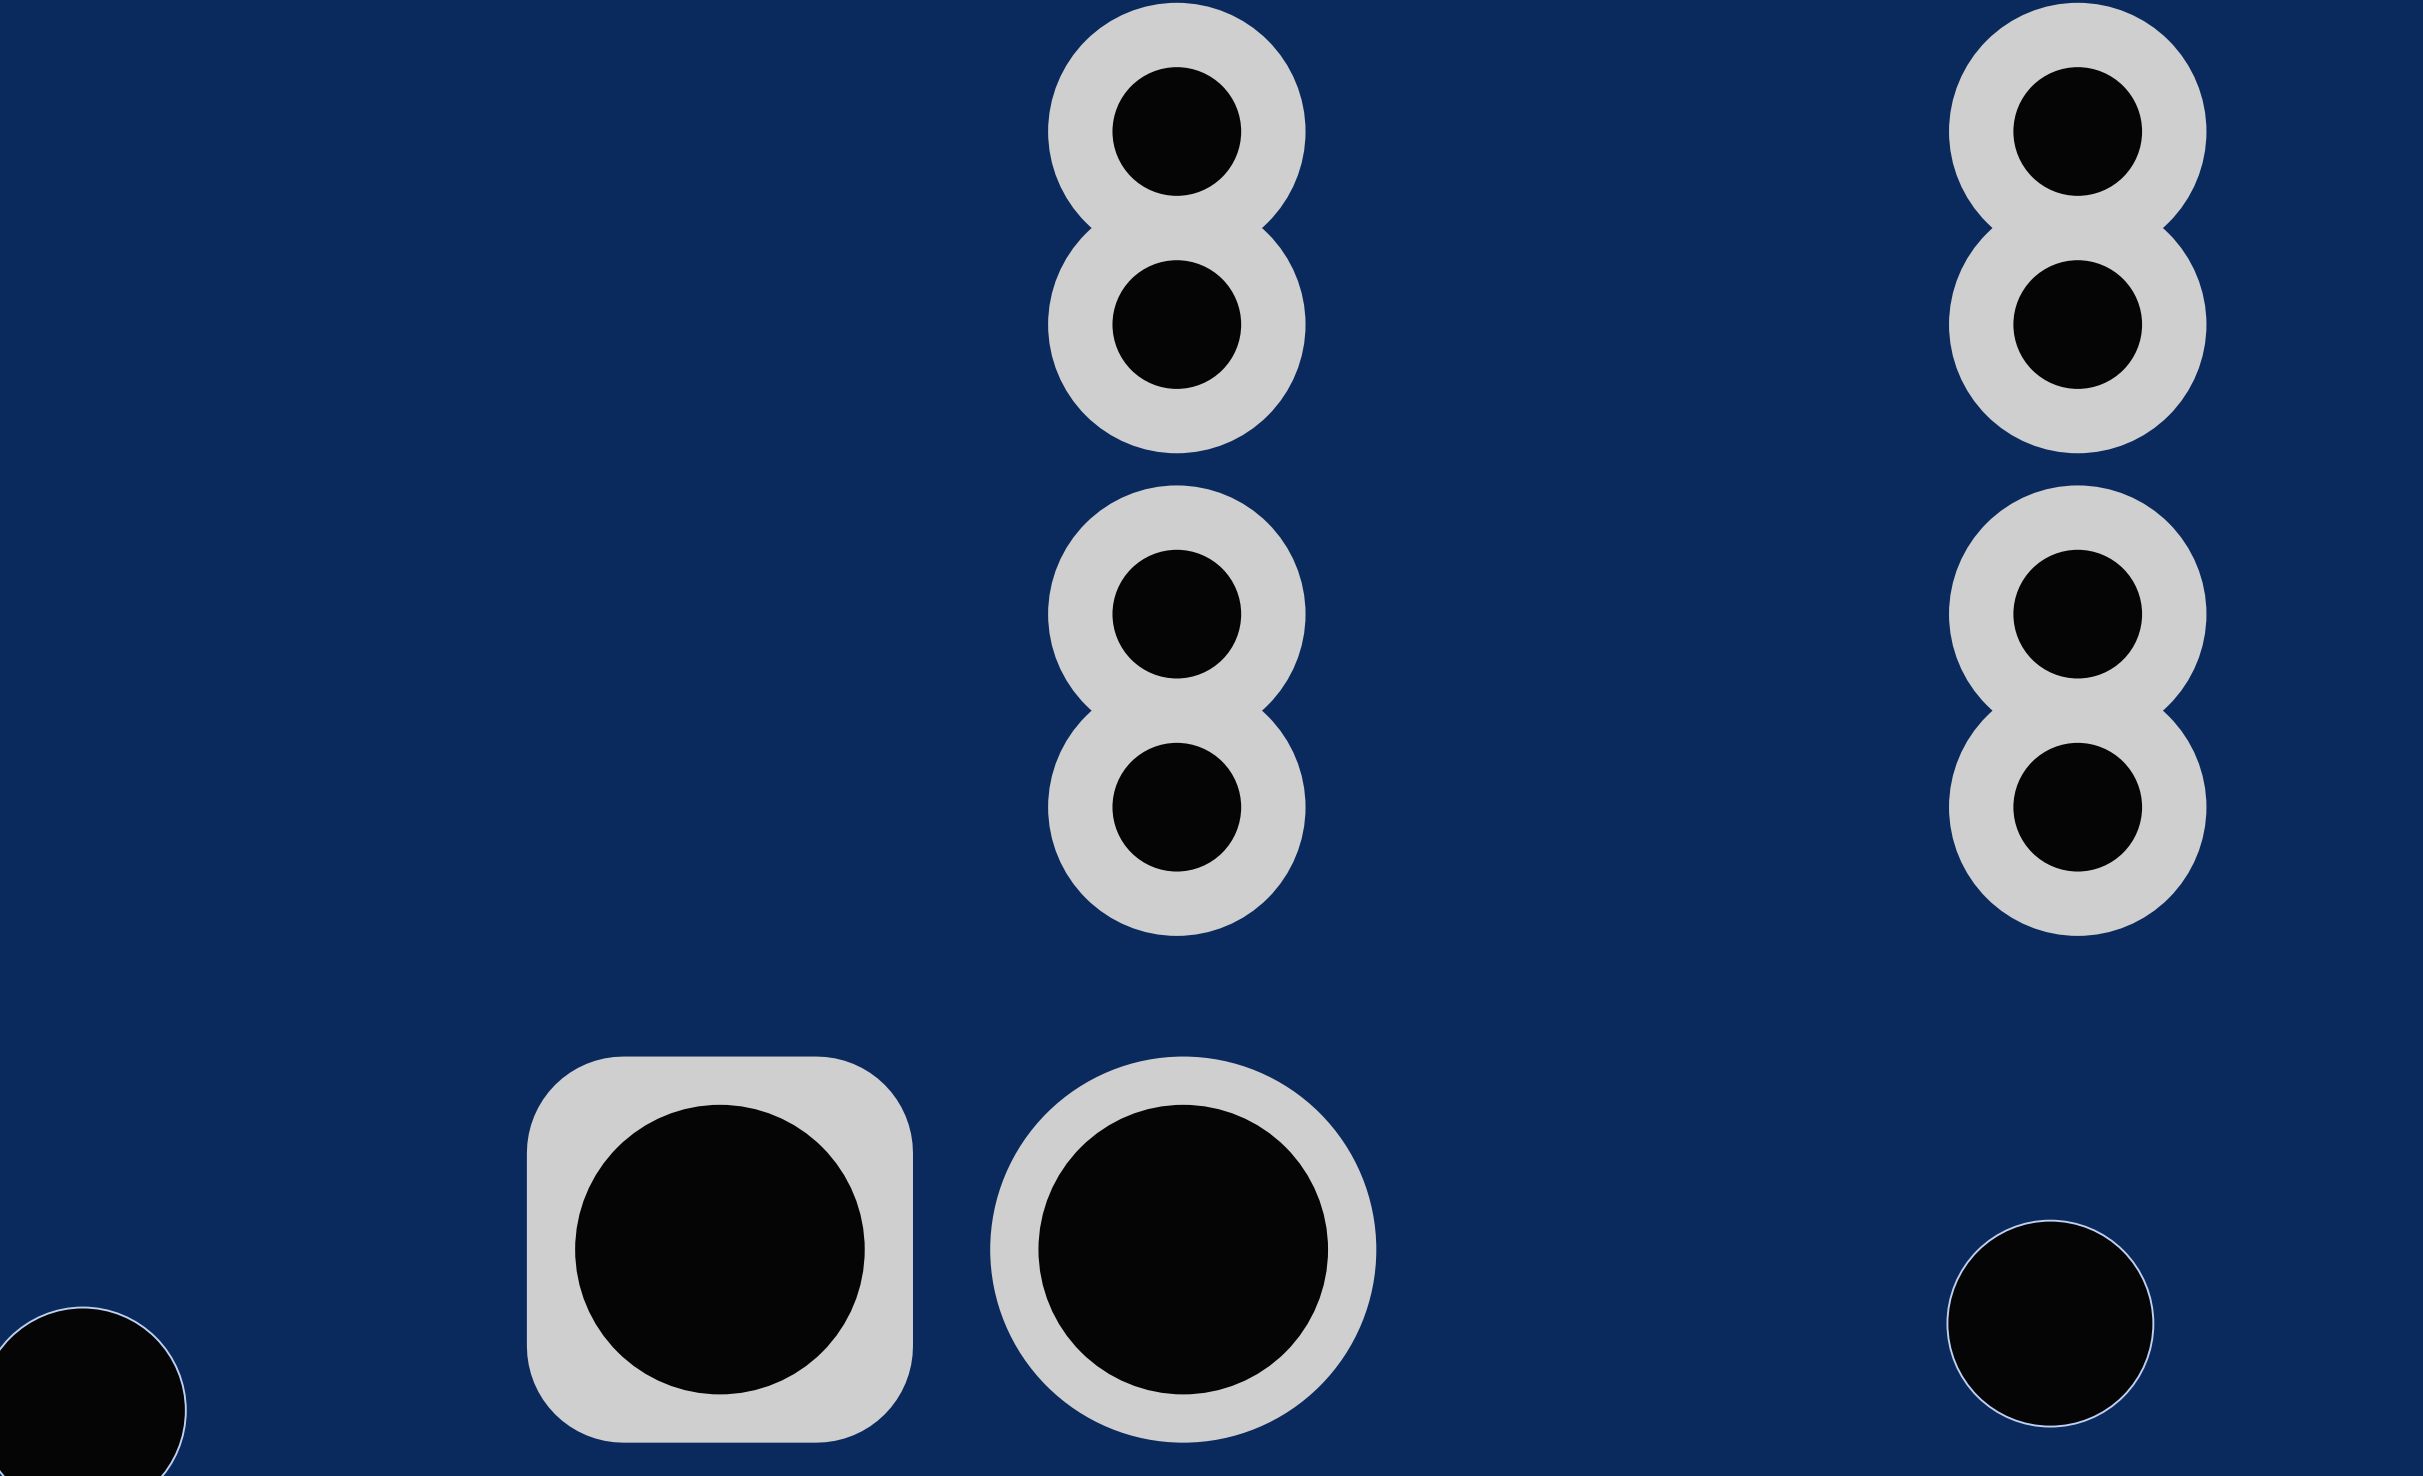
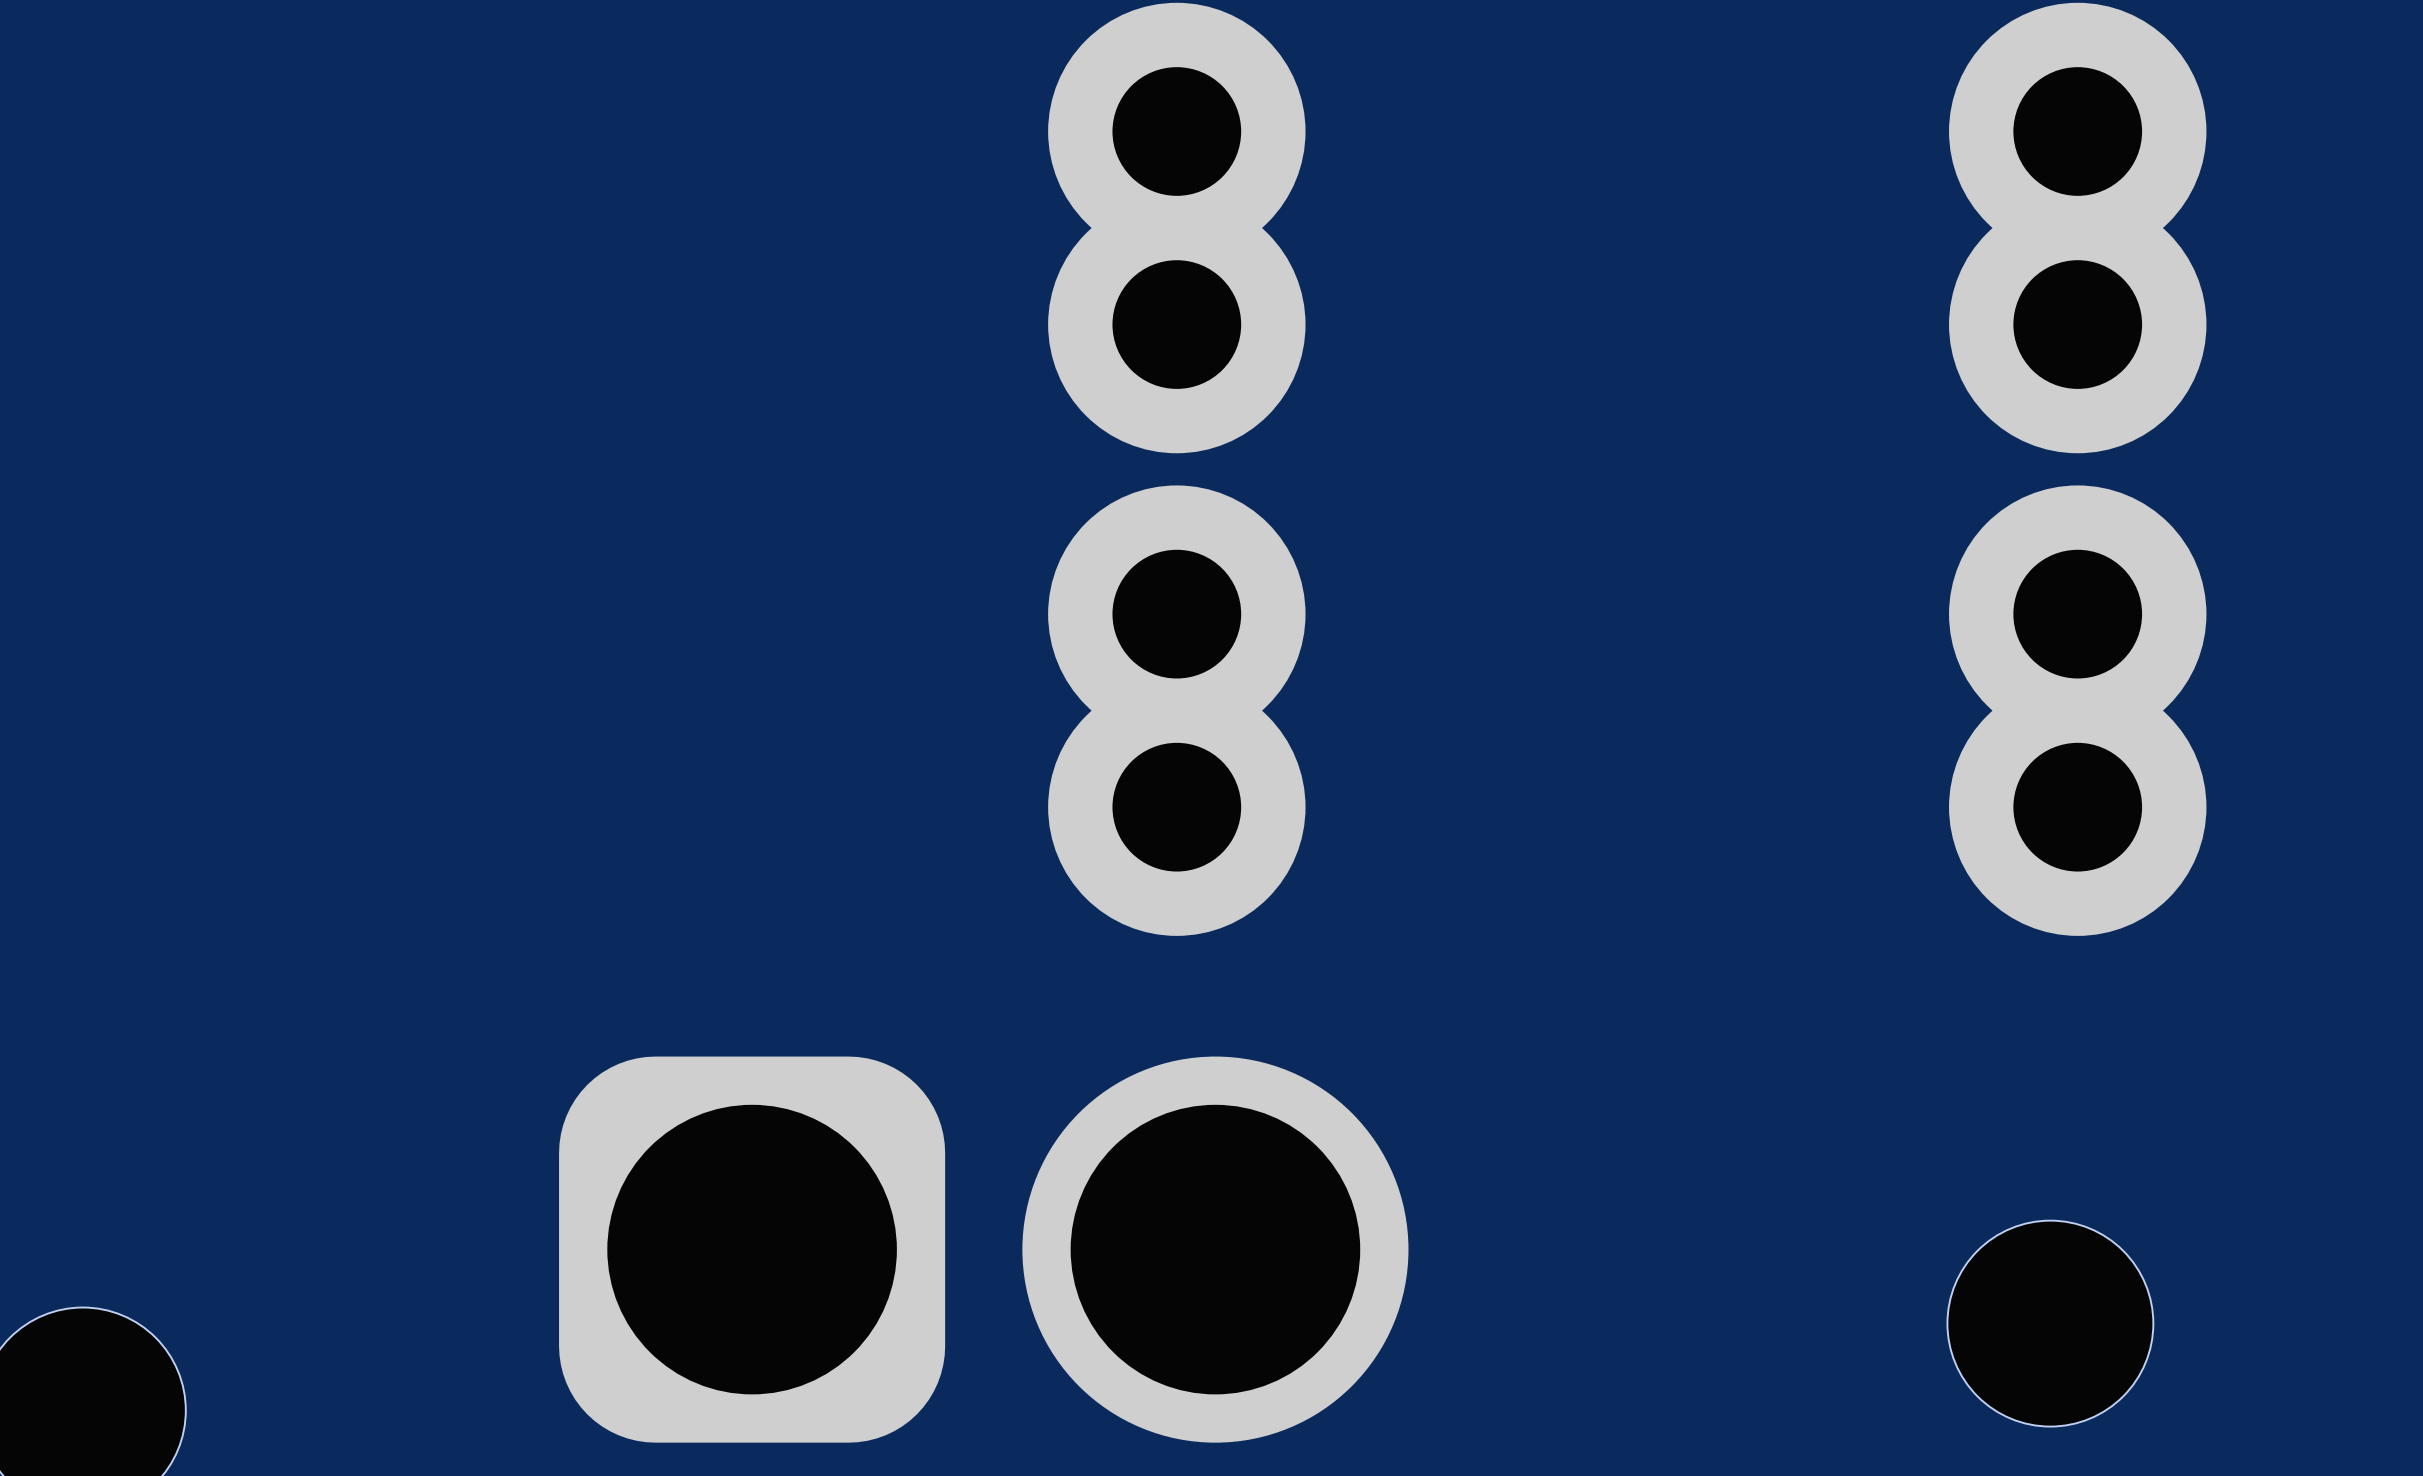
part position: (951, 1249) -> (983, 1249)

